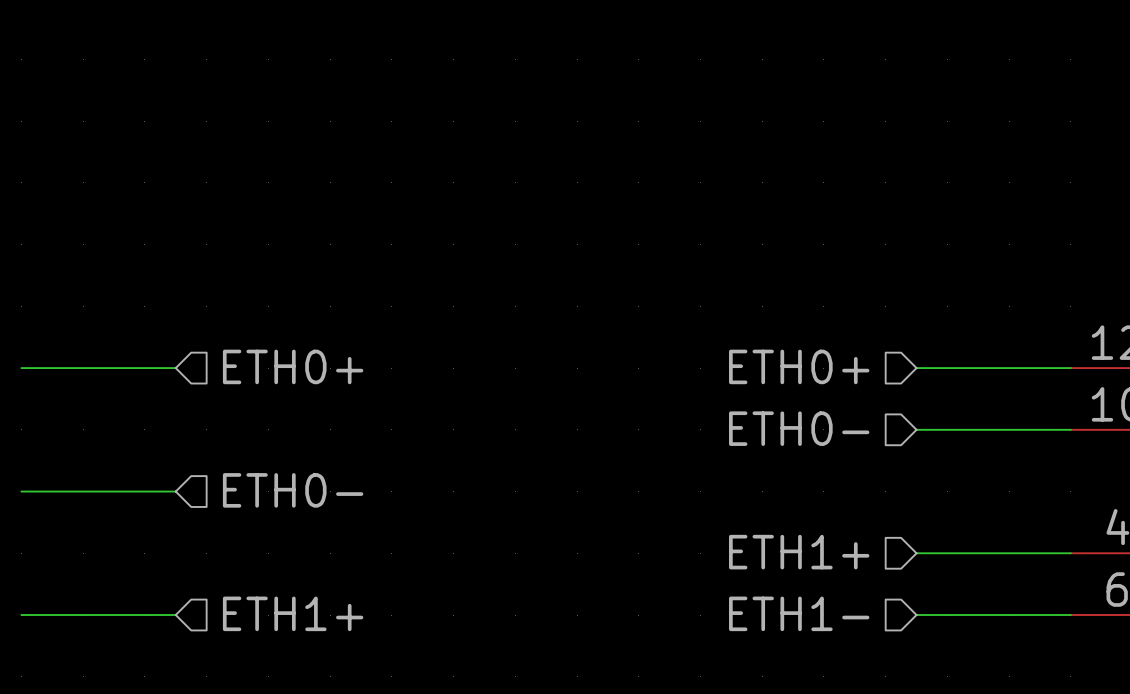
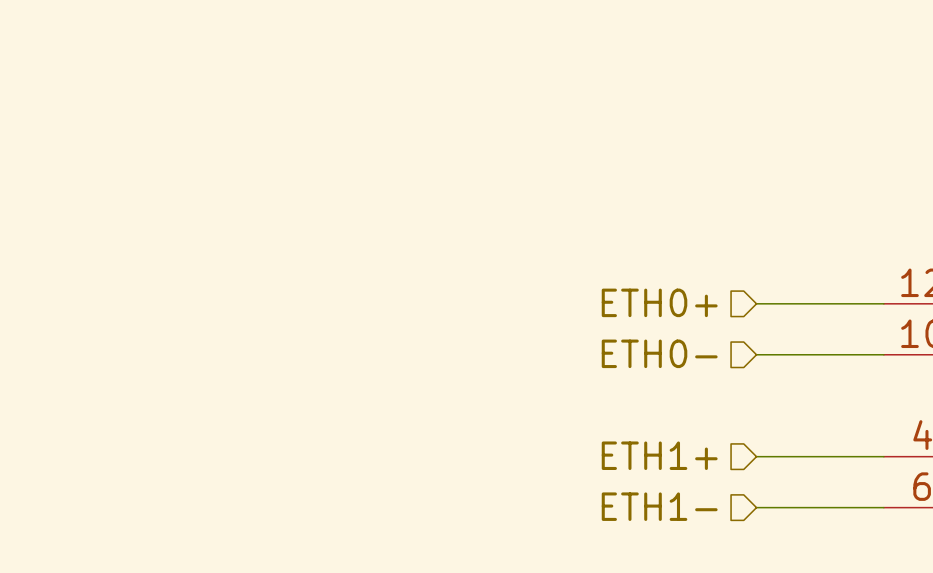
hierarchical label: ETH0+ (293, 366) -> none
wire: (21, 368) (175, 368) -> none
hierarchical label: ETH0- (293, 490) -> none
wire: (21, 491) (175, 491) -> none
hierarchical label: ETH1+ (293, 613) -> none
wire: (21, 615) (175, 615) -> none

